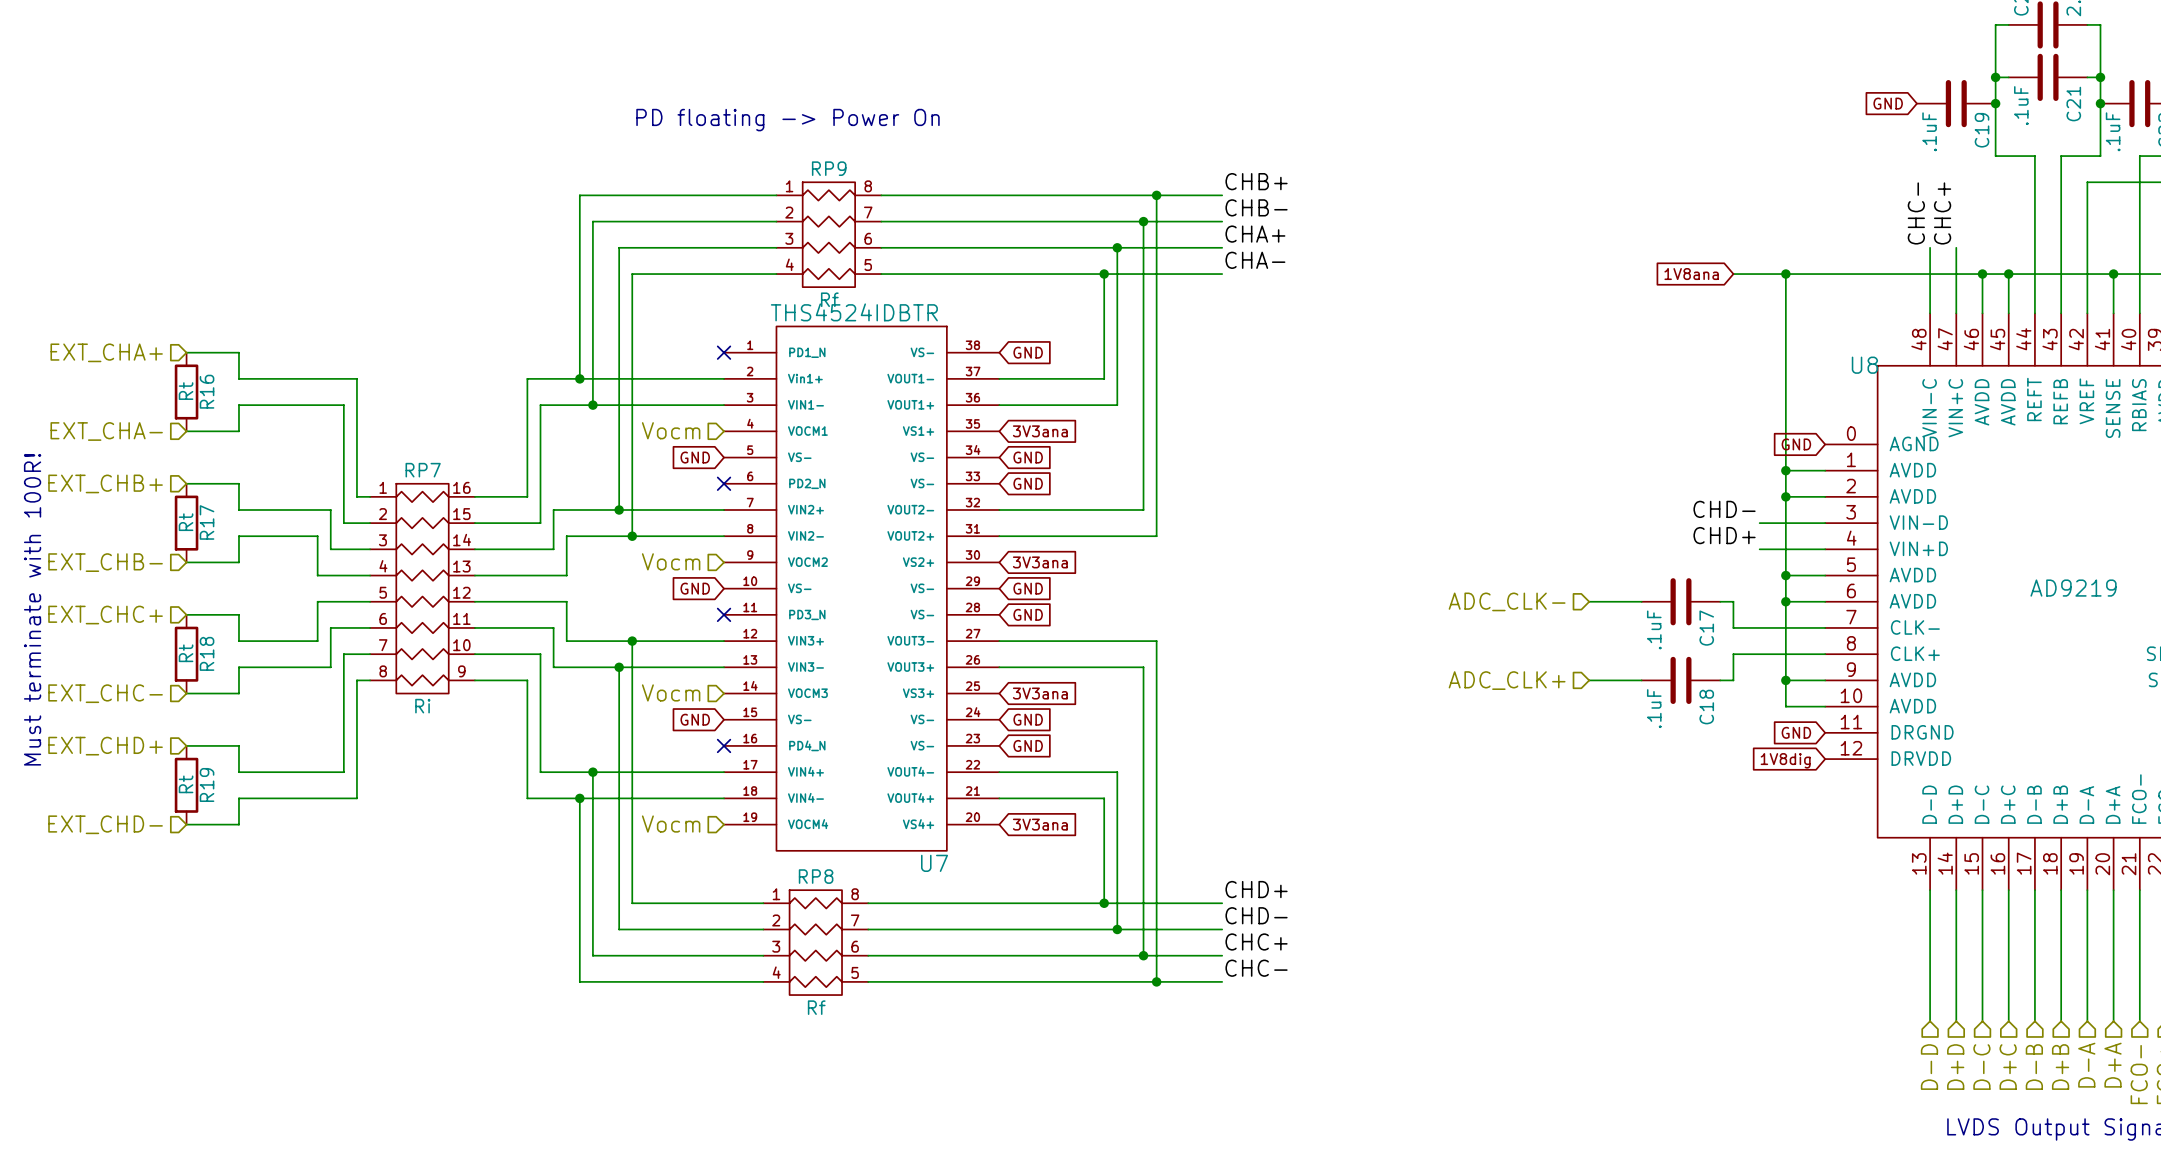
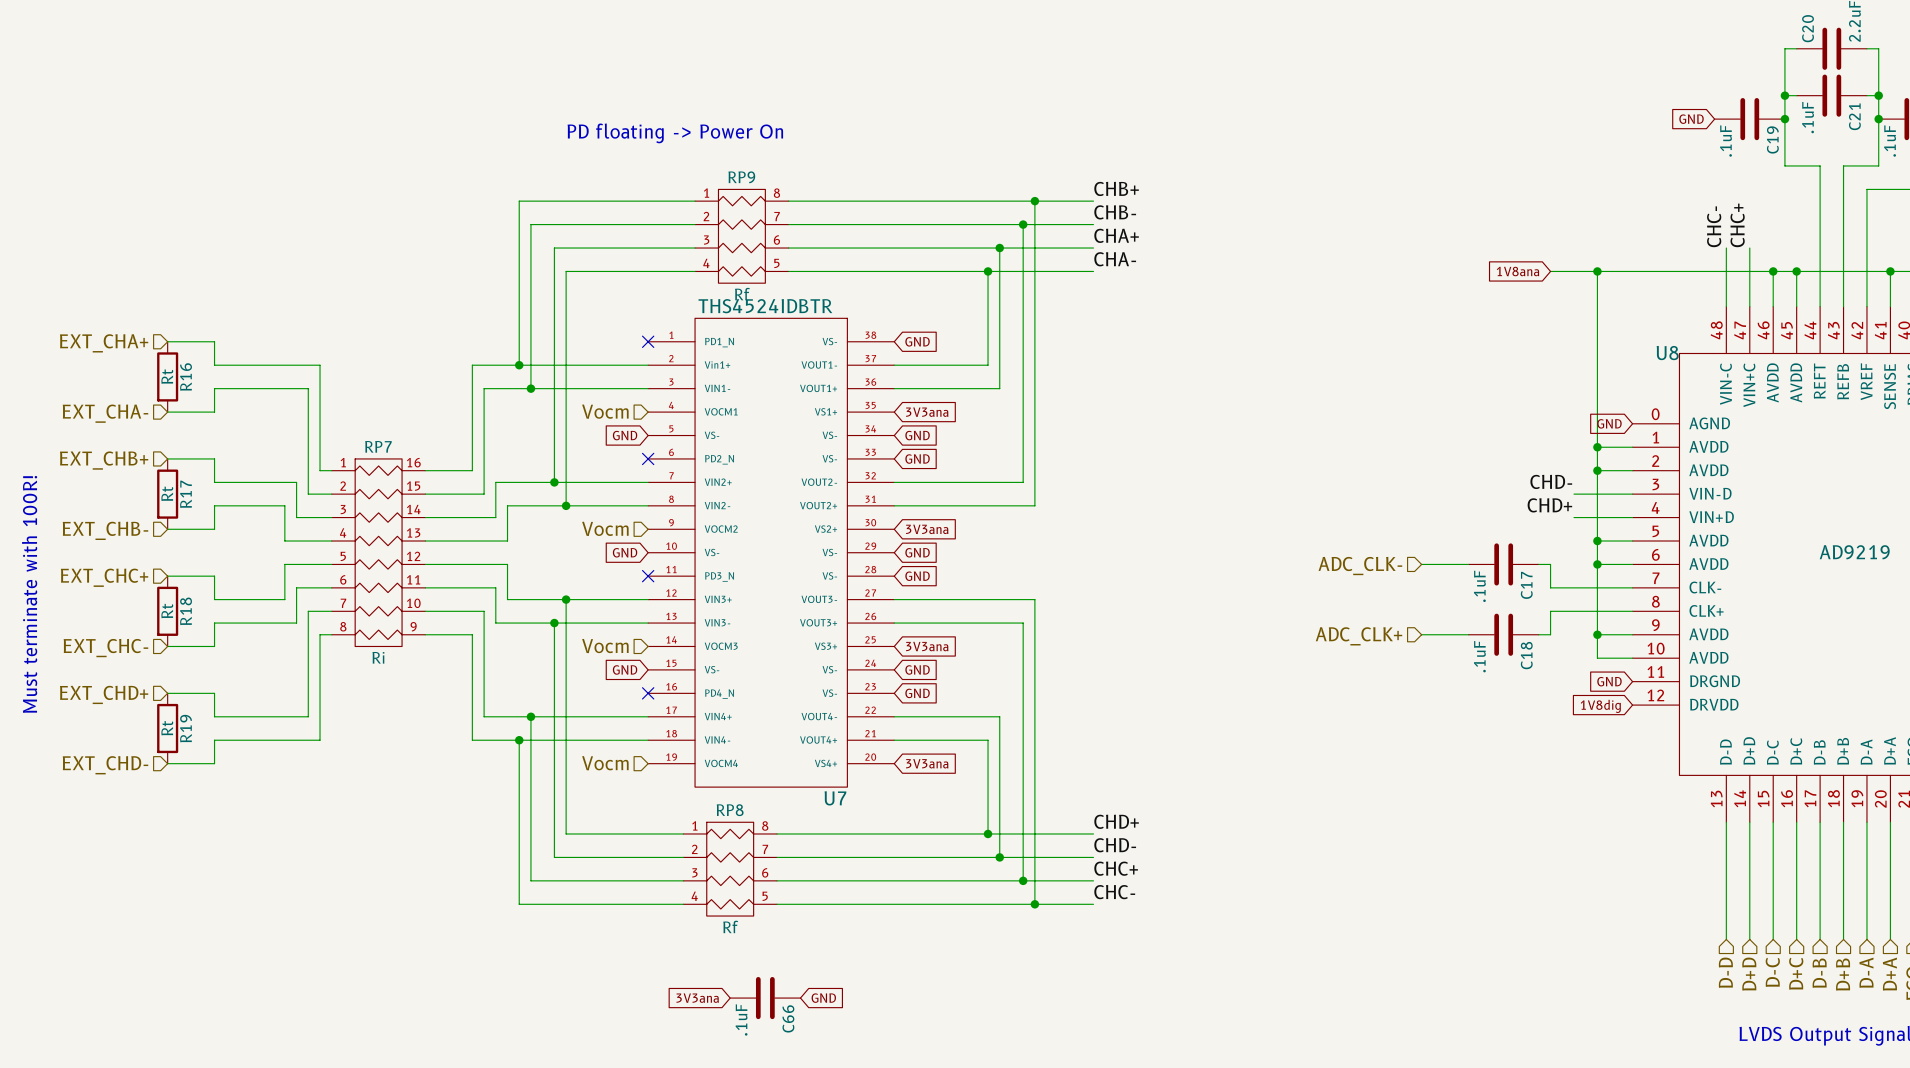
global label: none -> 3V3ana (697, 998)
C66: none -> .1uF (765, 998)
global label: none -> GND (823, 998)

